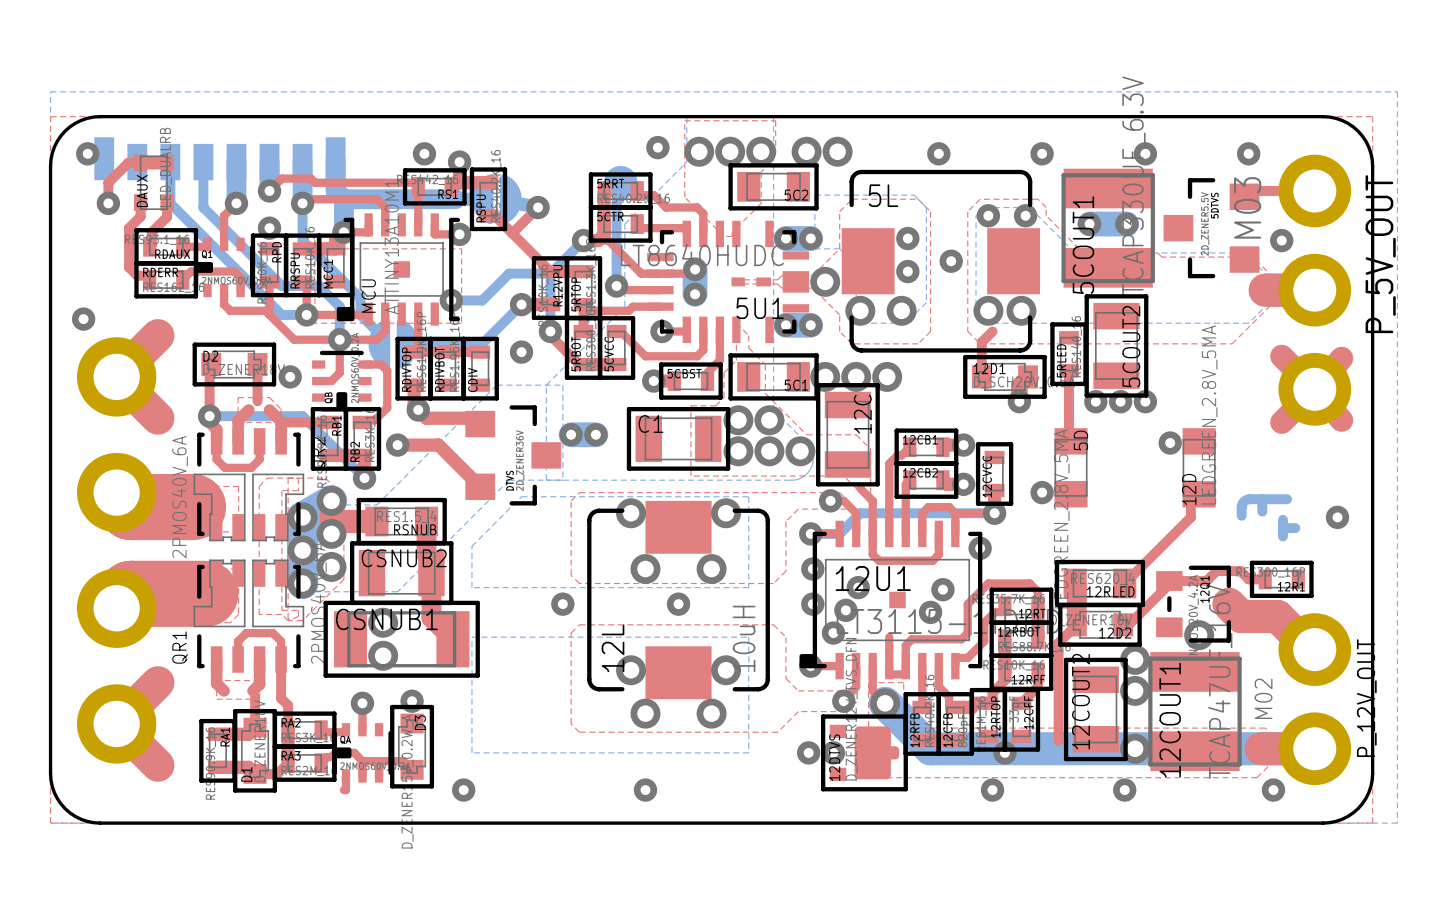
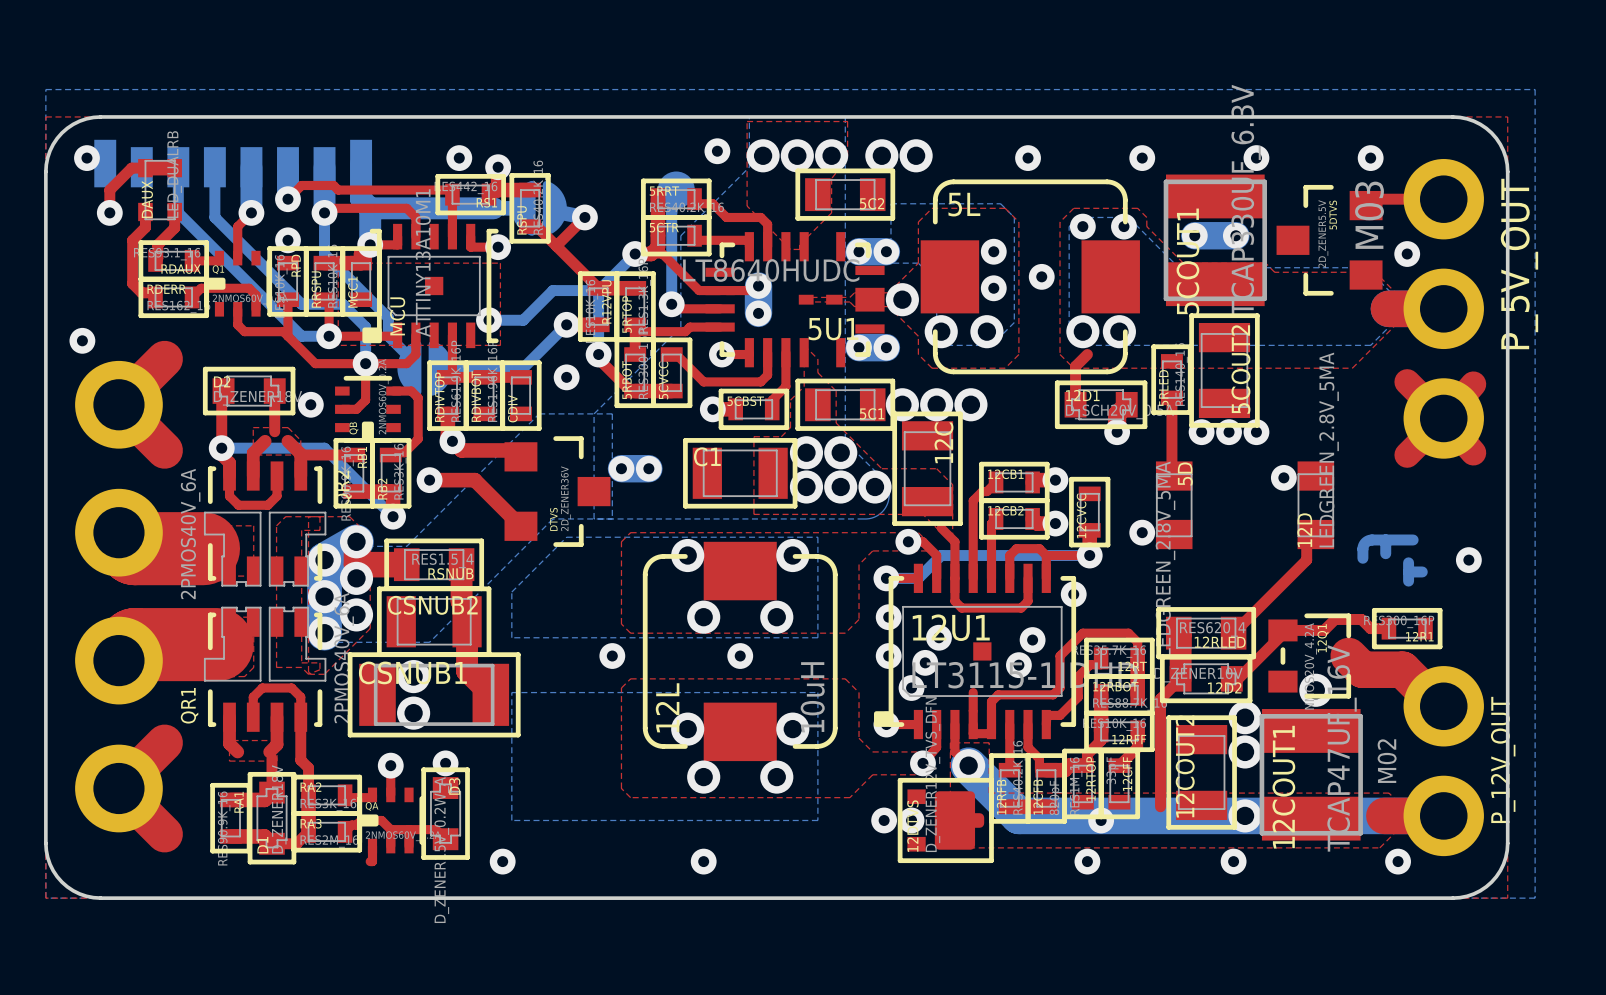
5L footprint: [841, 169, 1041, 353] -> [920, 179, 1140, 375]
12L footprint: [587, 500, 770, 700] -> [642, 541, 838, 762]

